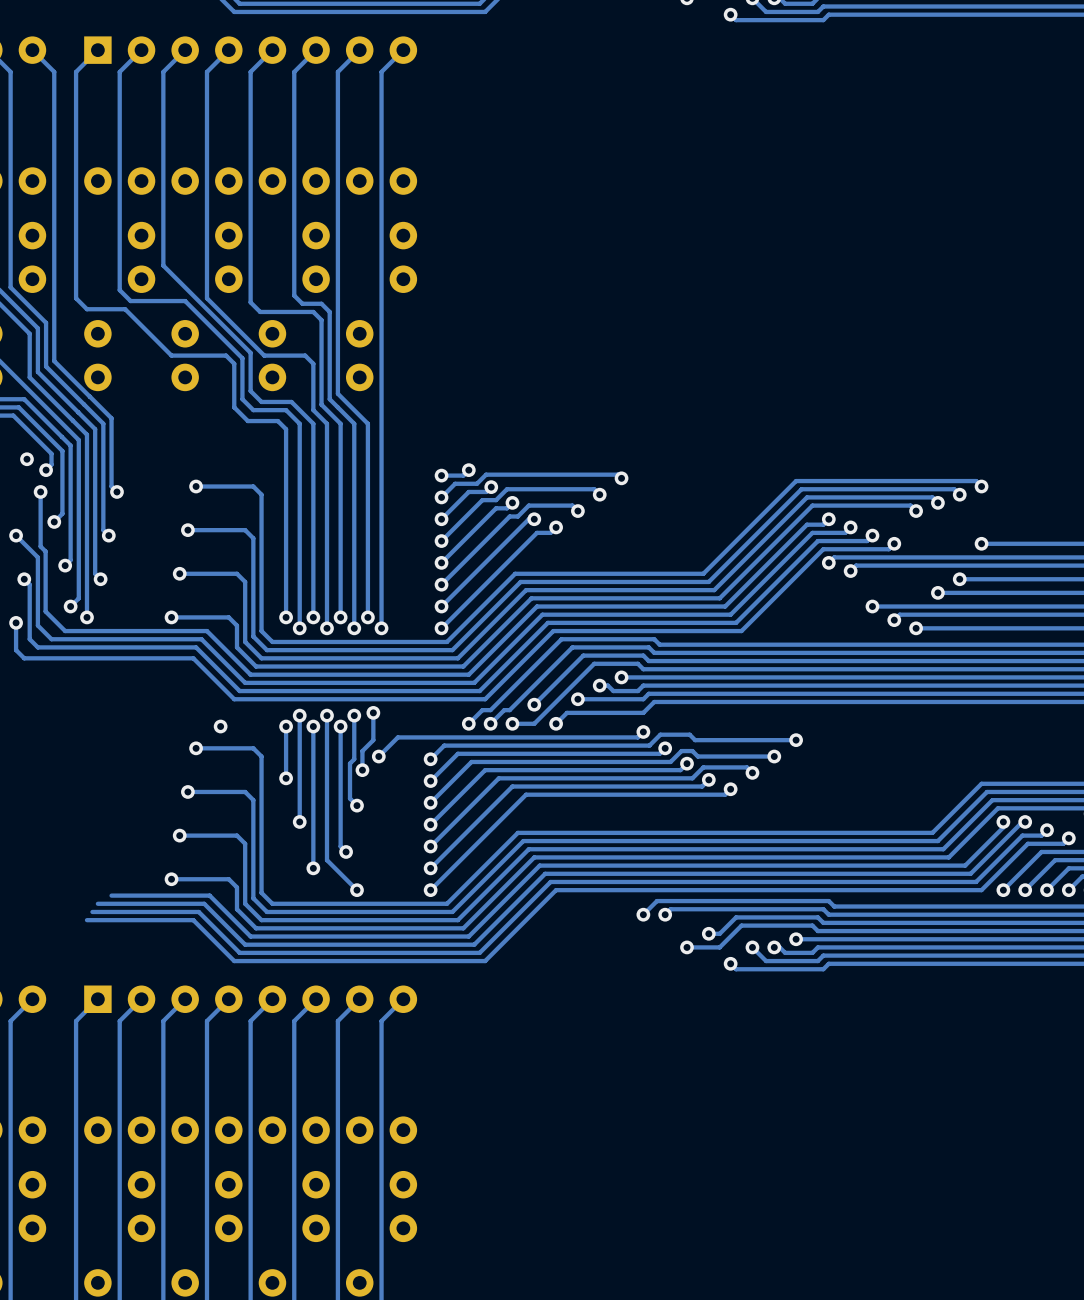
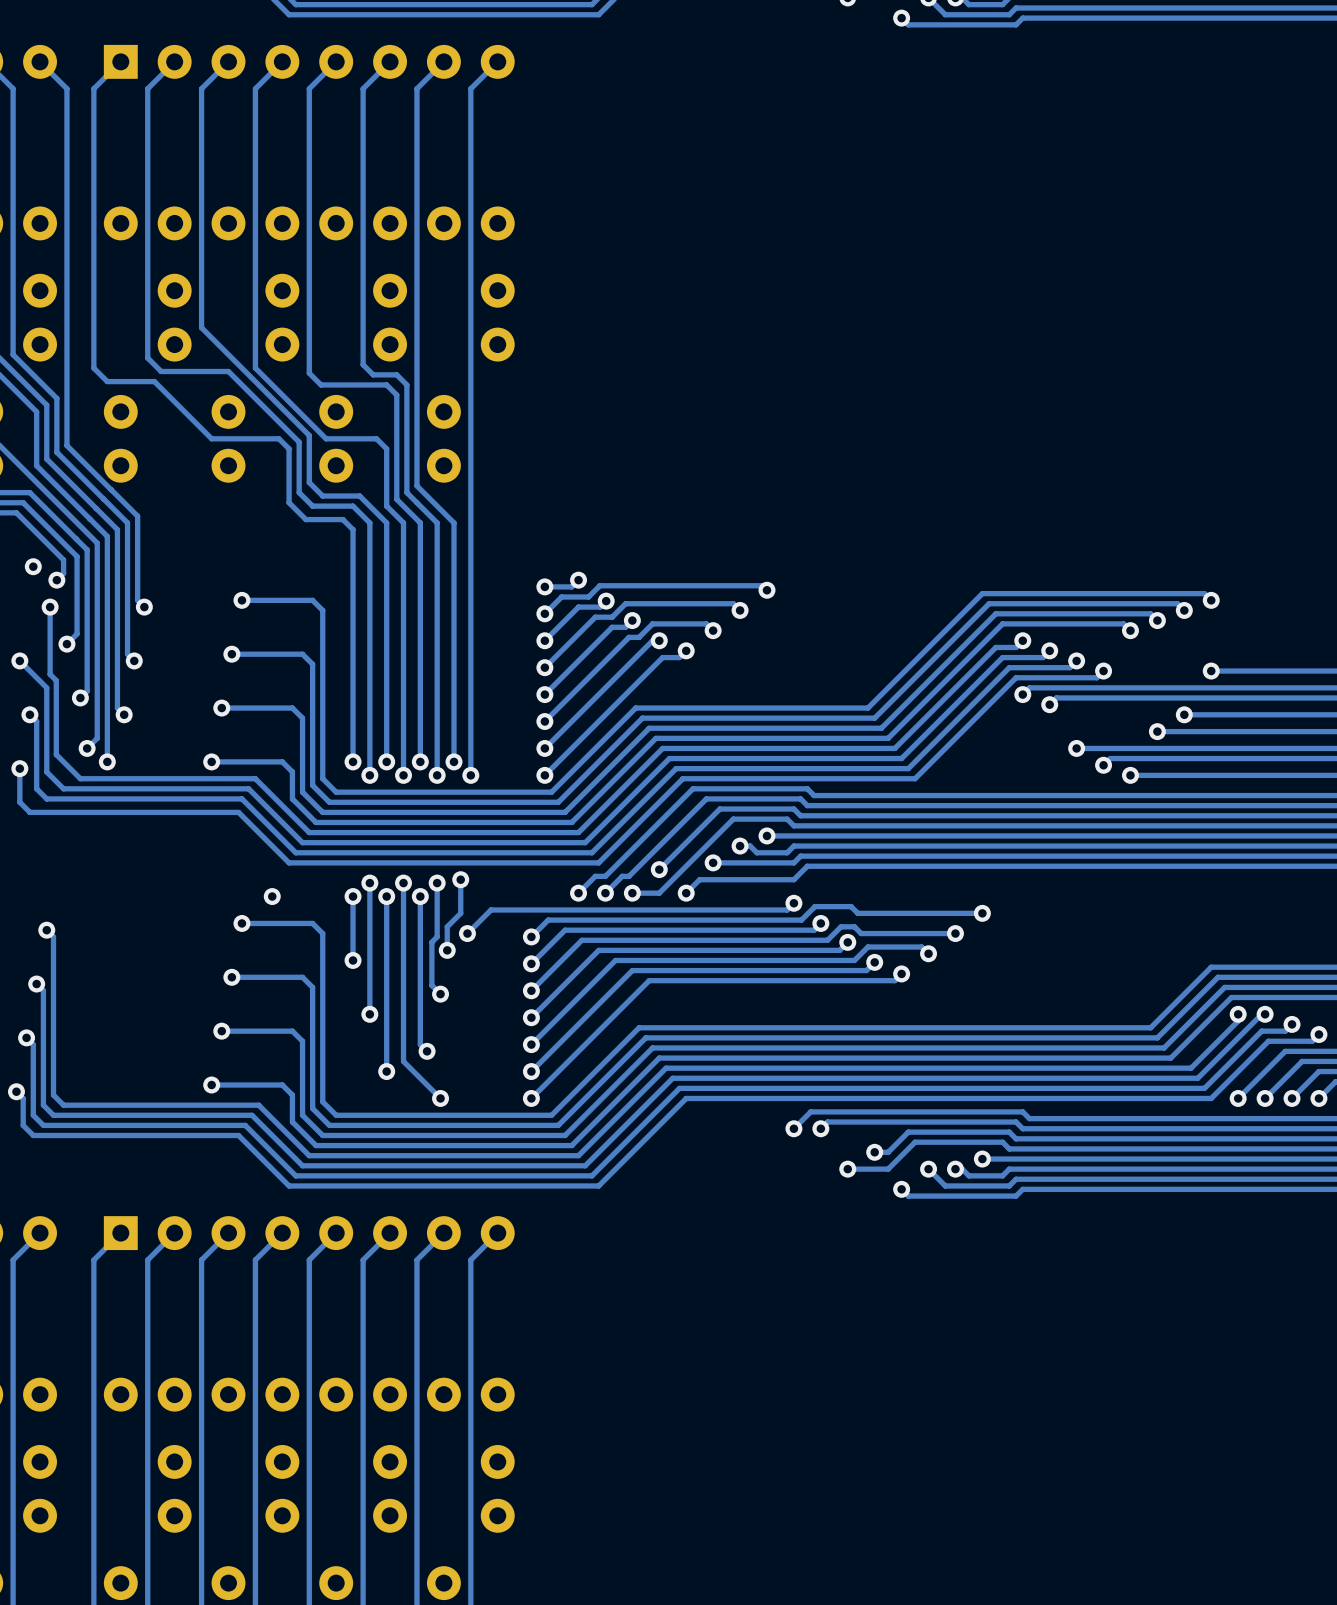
track: none -> (46, 930) (53, 936) (53, 1095) (63, 1105) (137, 1105)
via: none -> (46, 930)
track: none -> (36, 984) (43, 990) (43, 1105) (53, 1115) (120, 1115)
via: none -> (36, 984)
track: none -> (26, 1037) (33, 1044) (33, 1115) (43, 1125) (114, 1125)
via: none -> (26, 1037)
track: none -> (16, 1091) (23, 1098) (23, 1125) (33, 1135) (107, 1135)
via: none -> (16, 1091)

